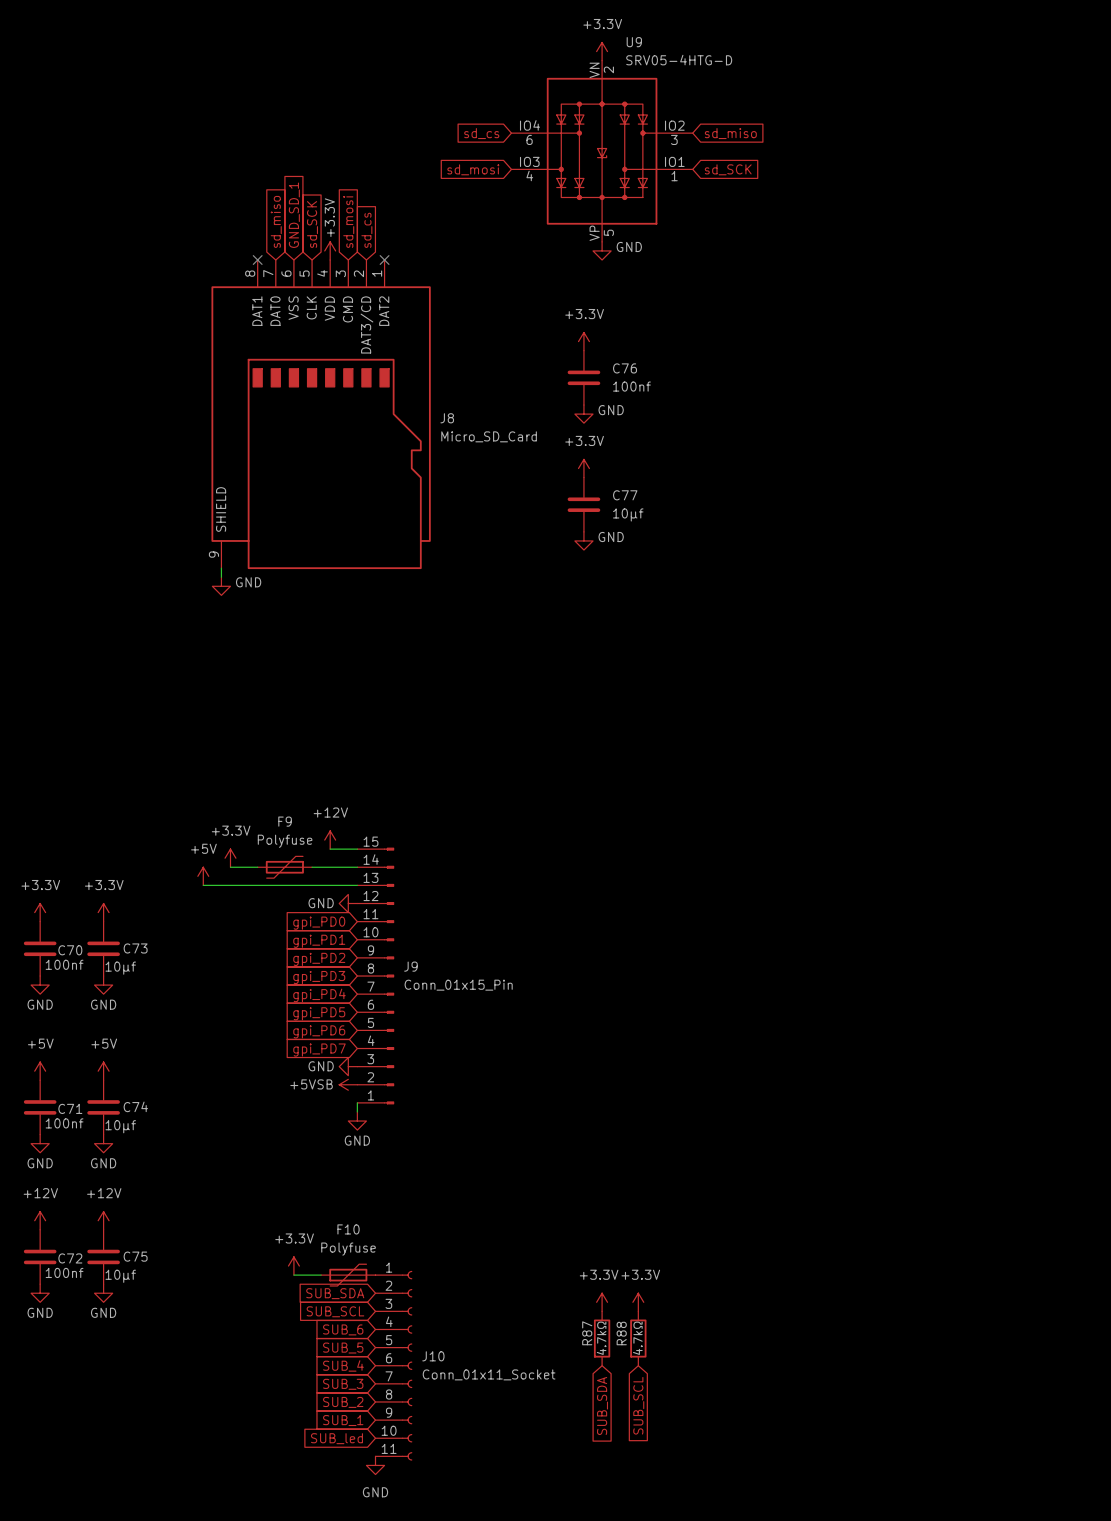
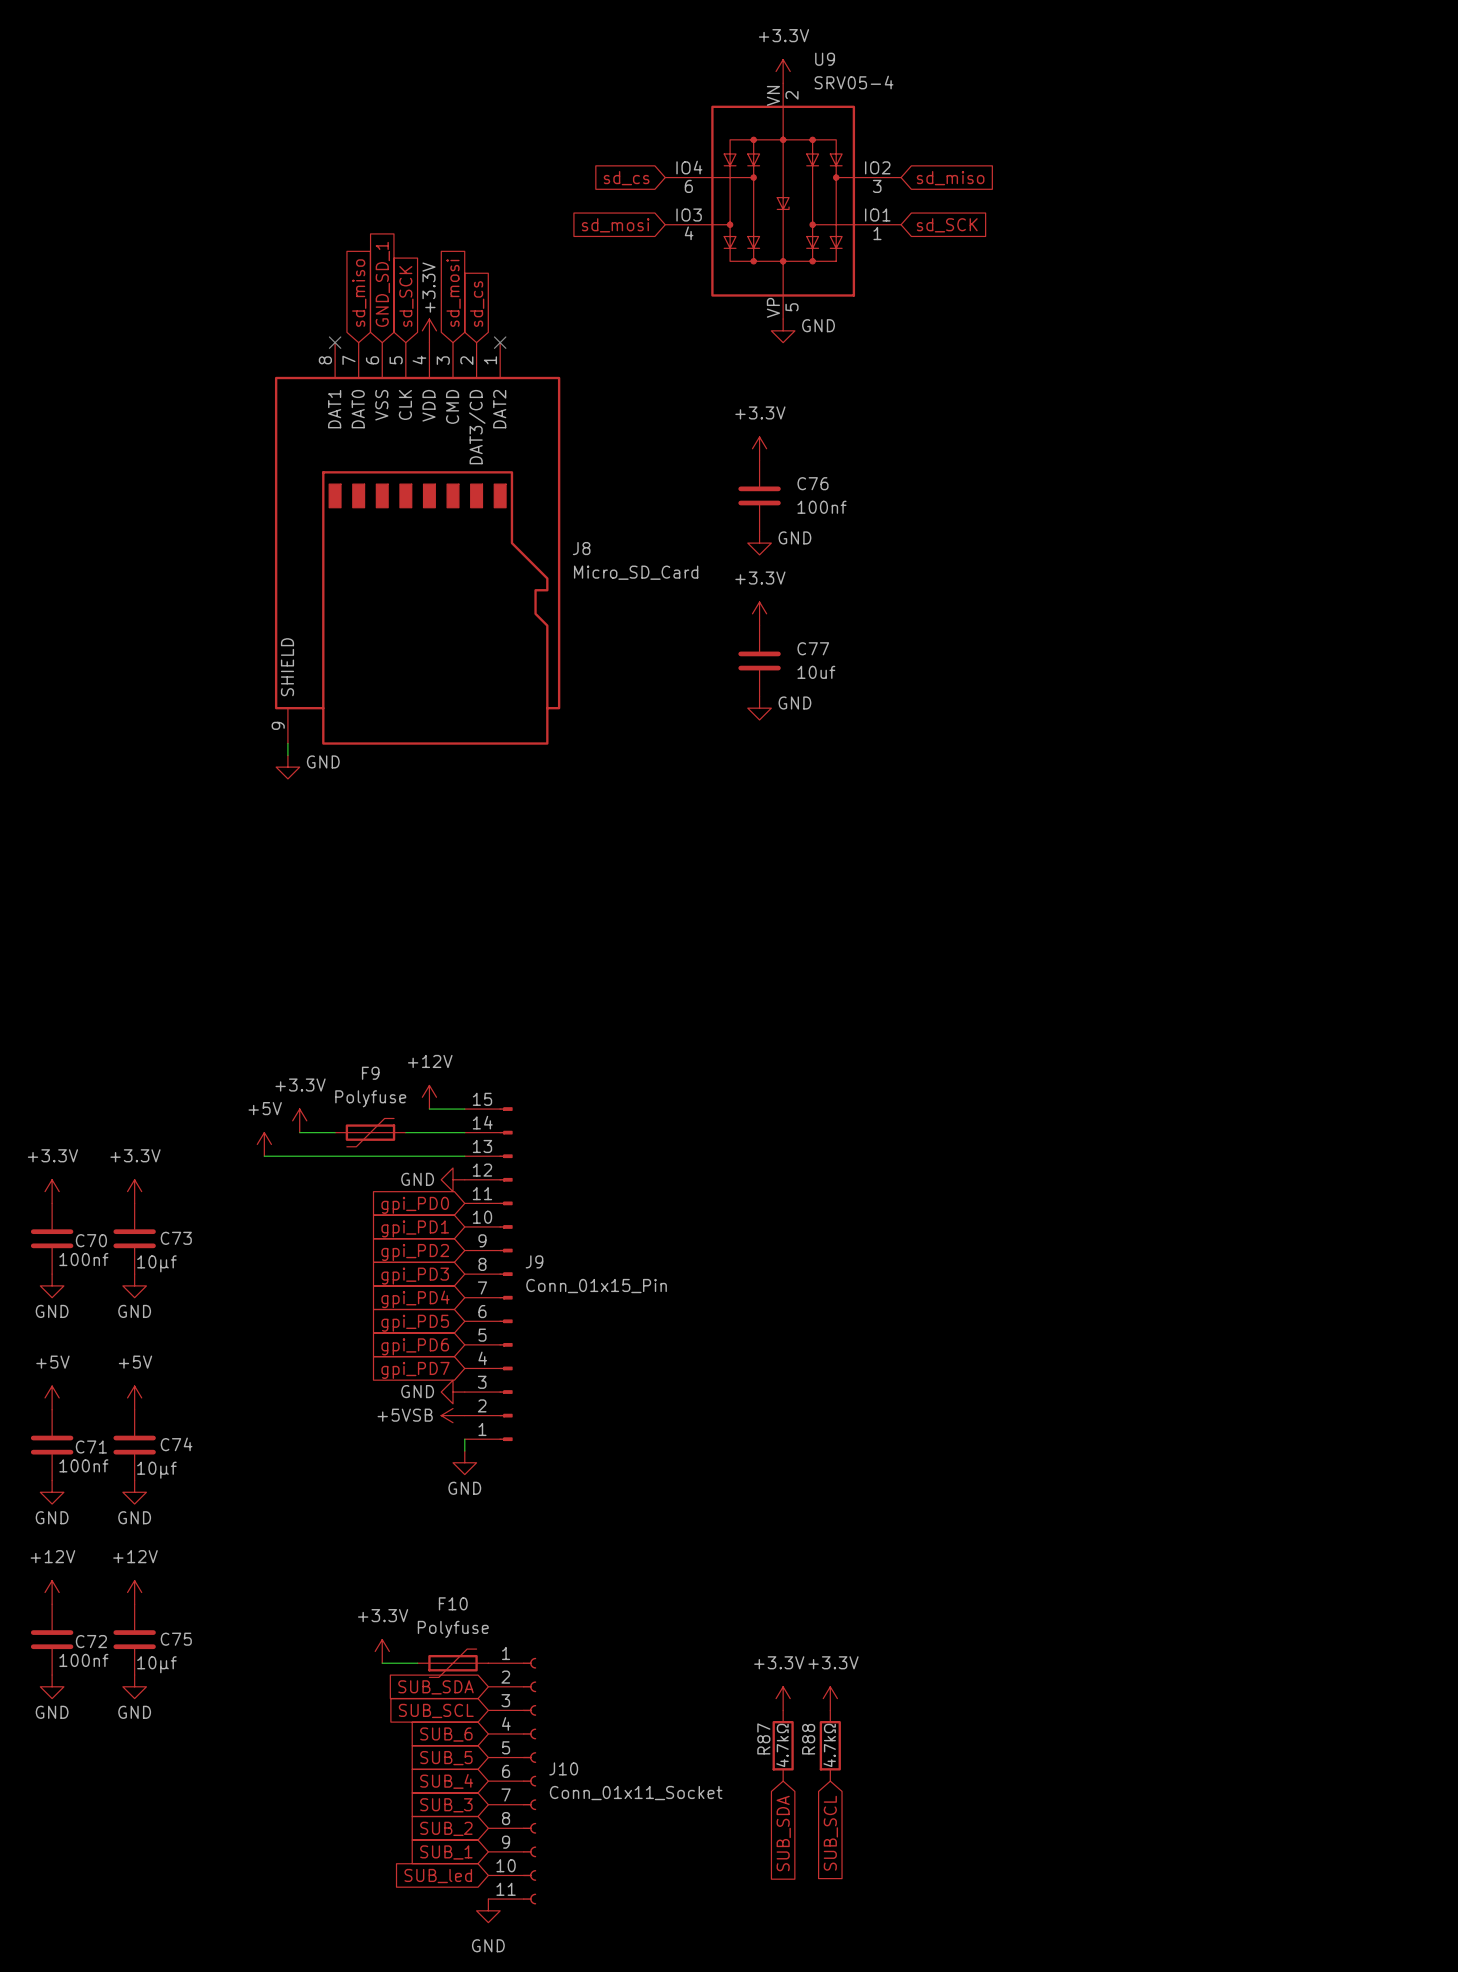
U9 value: SRV05-4HTG-D (679, 60) -> SRV05-4 (854, 82)
C77 value: 10µf (628, 514) -> 10uf (816, 672)

